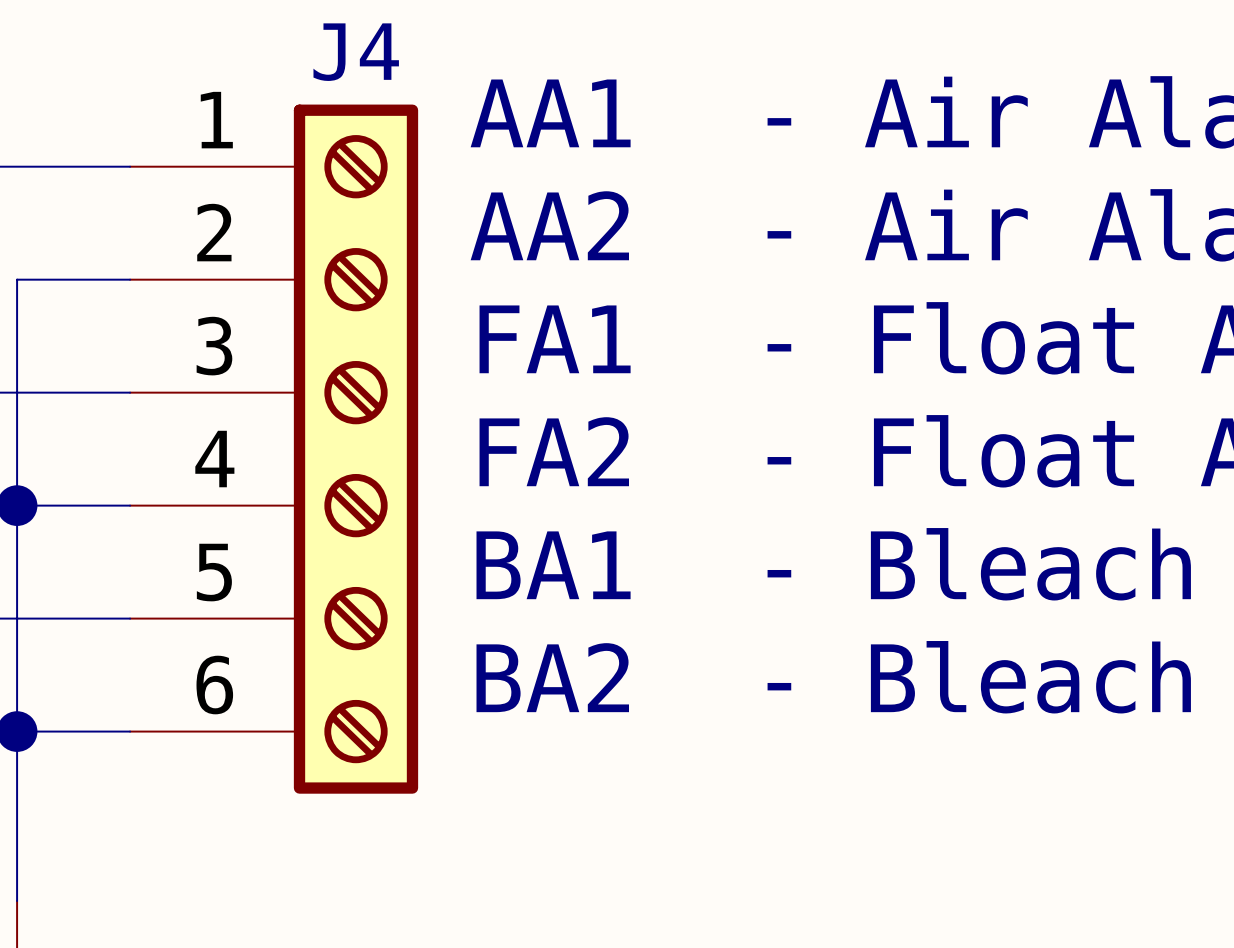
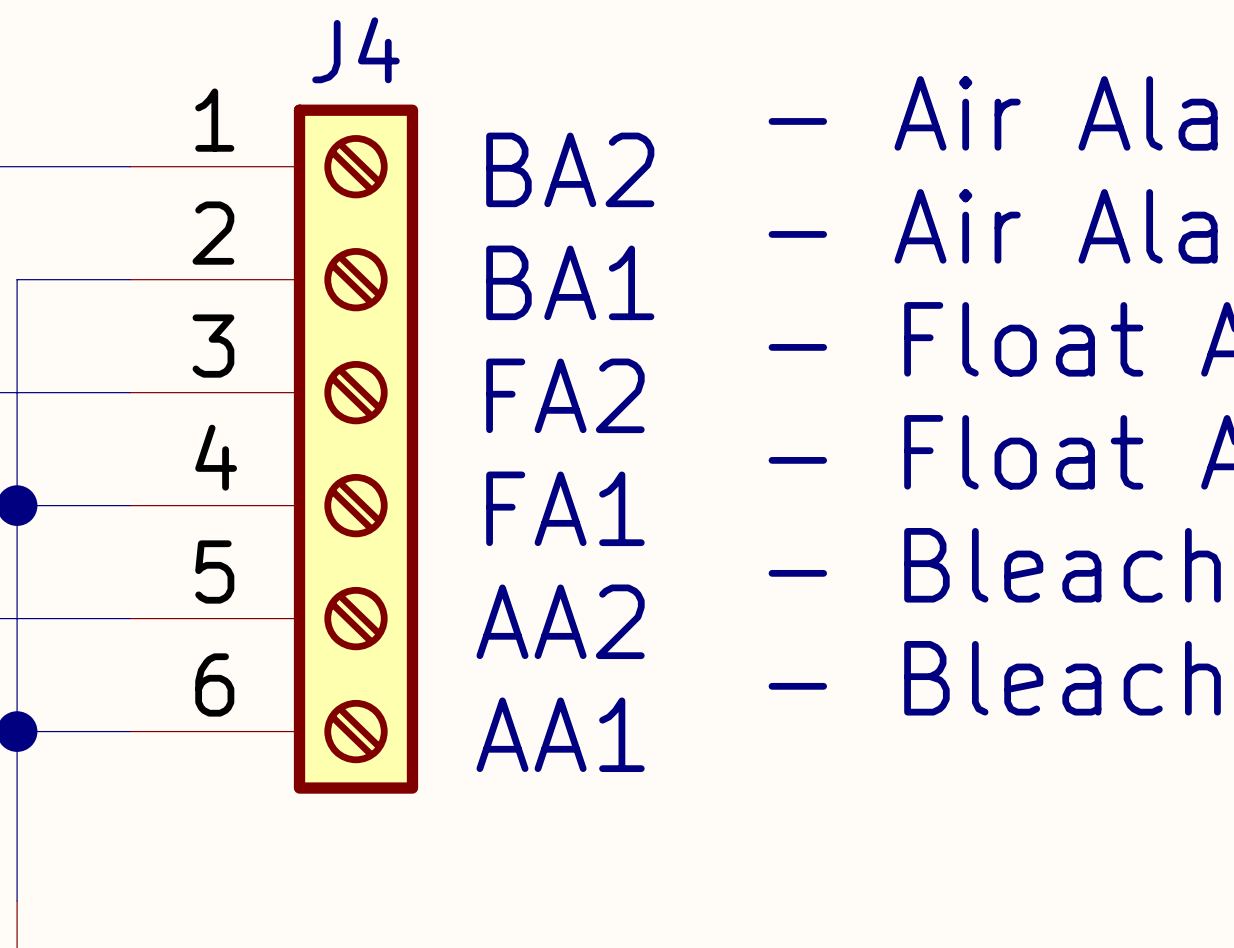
text position: AA1 (550, 113) -> AA1 (560, 734)
text position: AA2 (549, 225) -> AA2 (560, 621)
text position: FA1 (555, 339) -> FA1 (565, 508)
text position: FA2 (554, 451) -> FA2 (565, 395)
text position: BA1 (553, 565) -> BA1 (570, 282)
text position: BA2 (552, 677) -> BA2 (570, 169)

